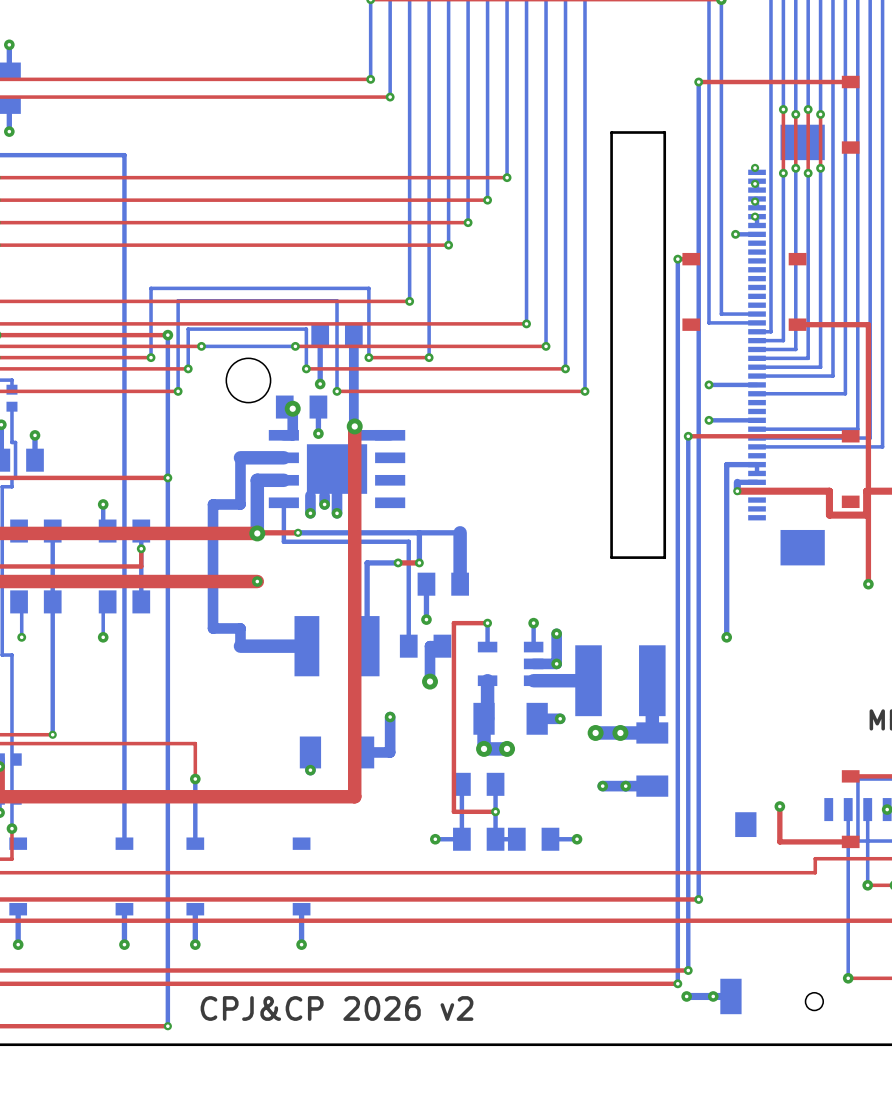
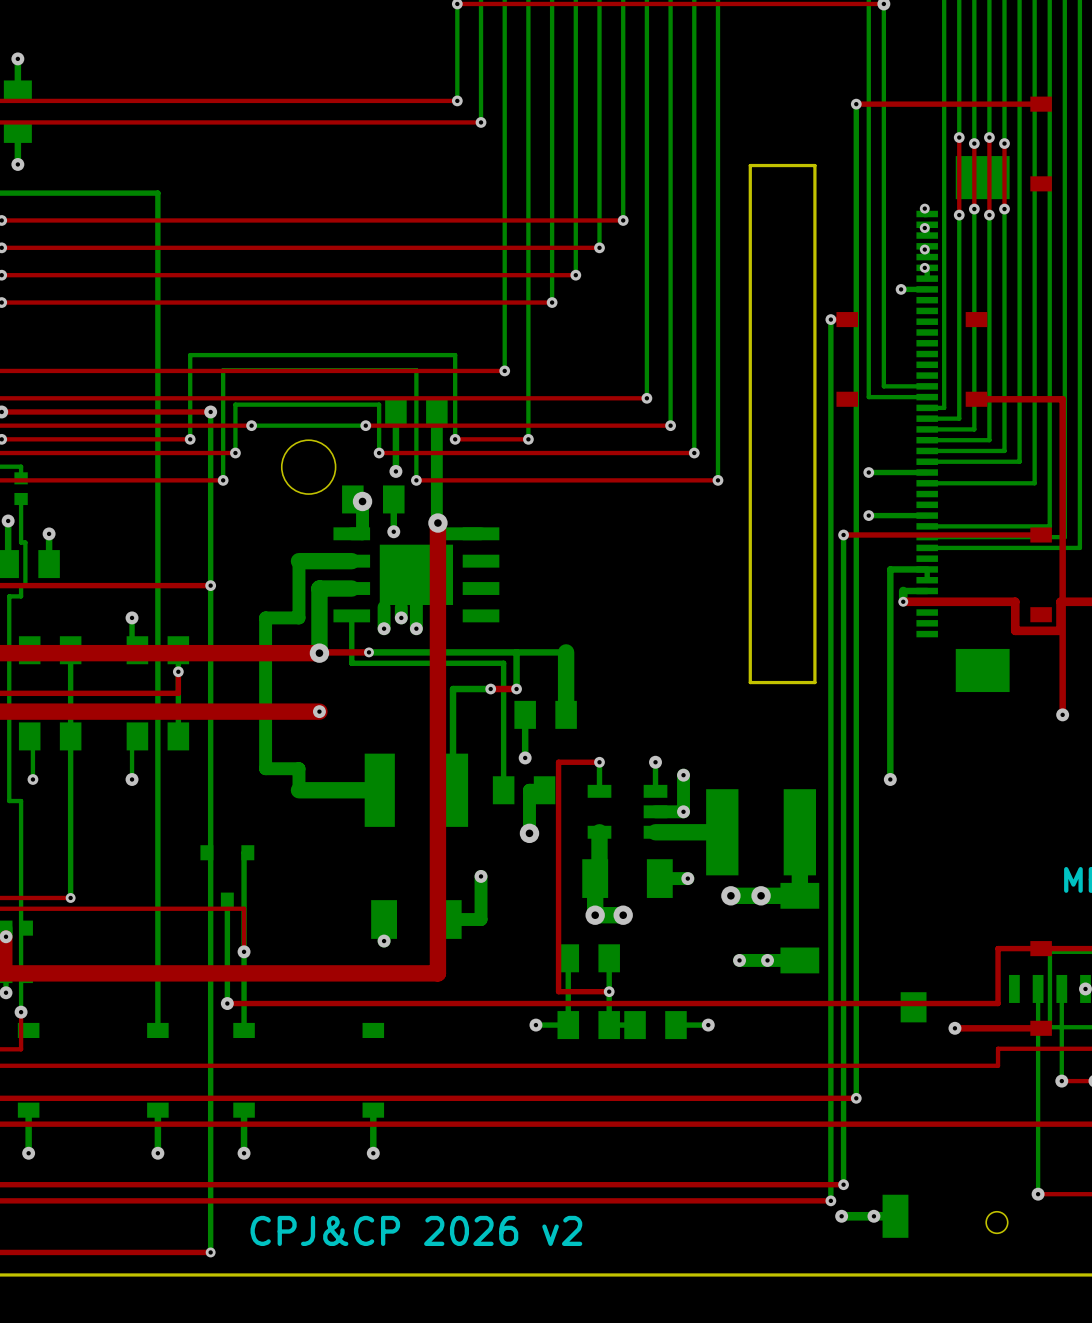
bottom track: none -> (247, 852) (244, 852) (244, 951)
part: none -> (227, 876)
bottom track: none -> (227, 900) (227, 1003)
top track: none -> (1041, 948) (998, 948) (998, 1003) (227, 1003)
top track: (779, 806) (779, 841) -> none
via position: (779, 806) -> (954, 1028)
via: none -> (227, 1003)

